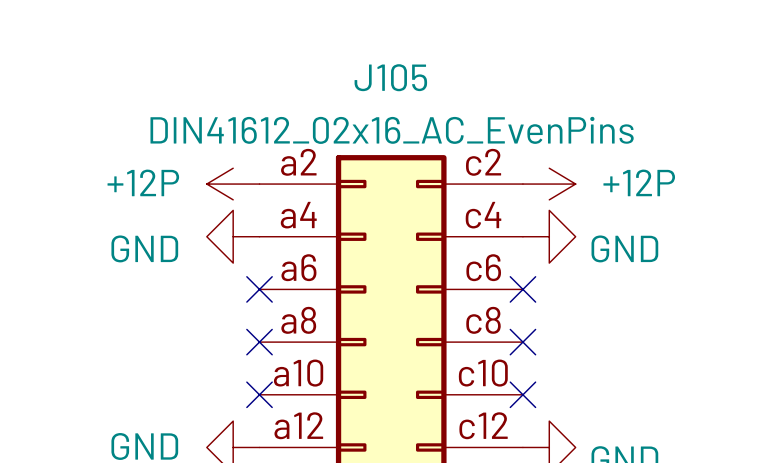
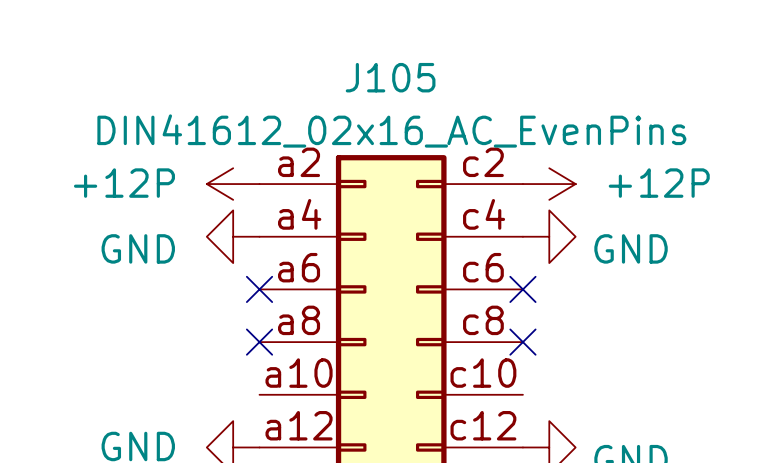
no-connect mark: (259, 394) -> none
no-connect mark: (522, 394) -> none

